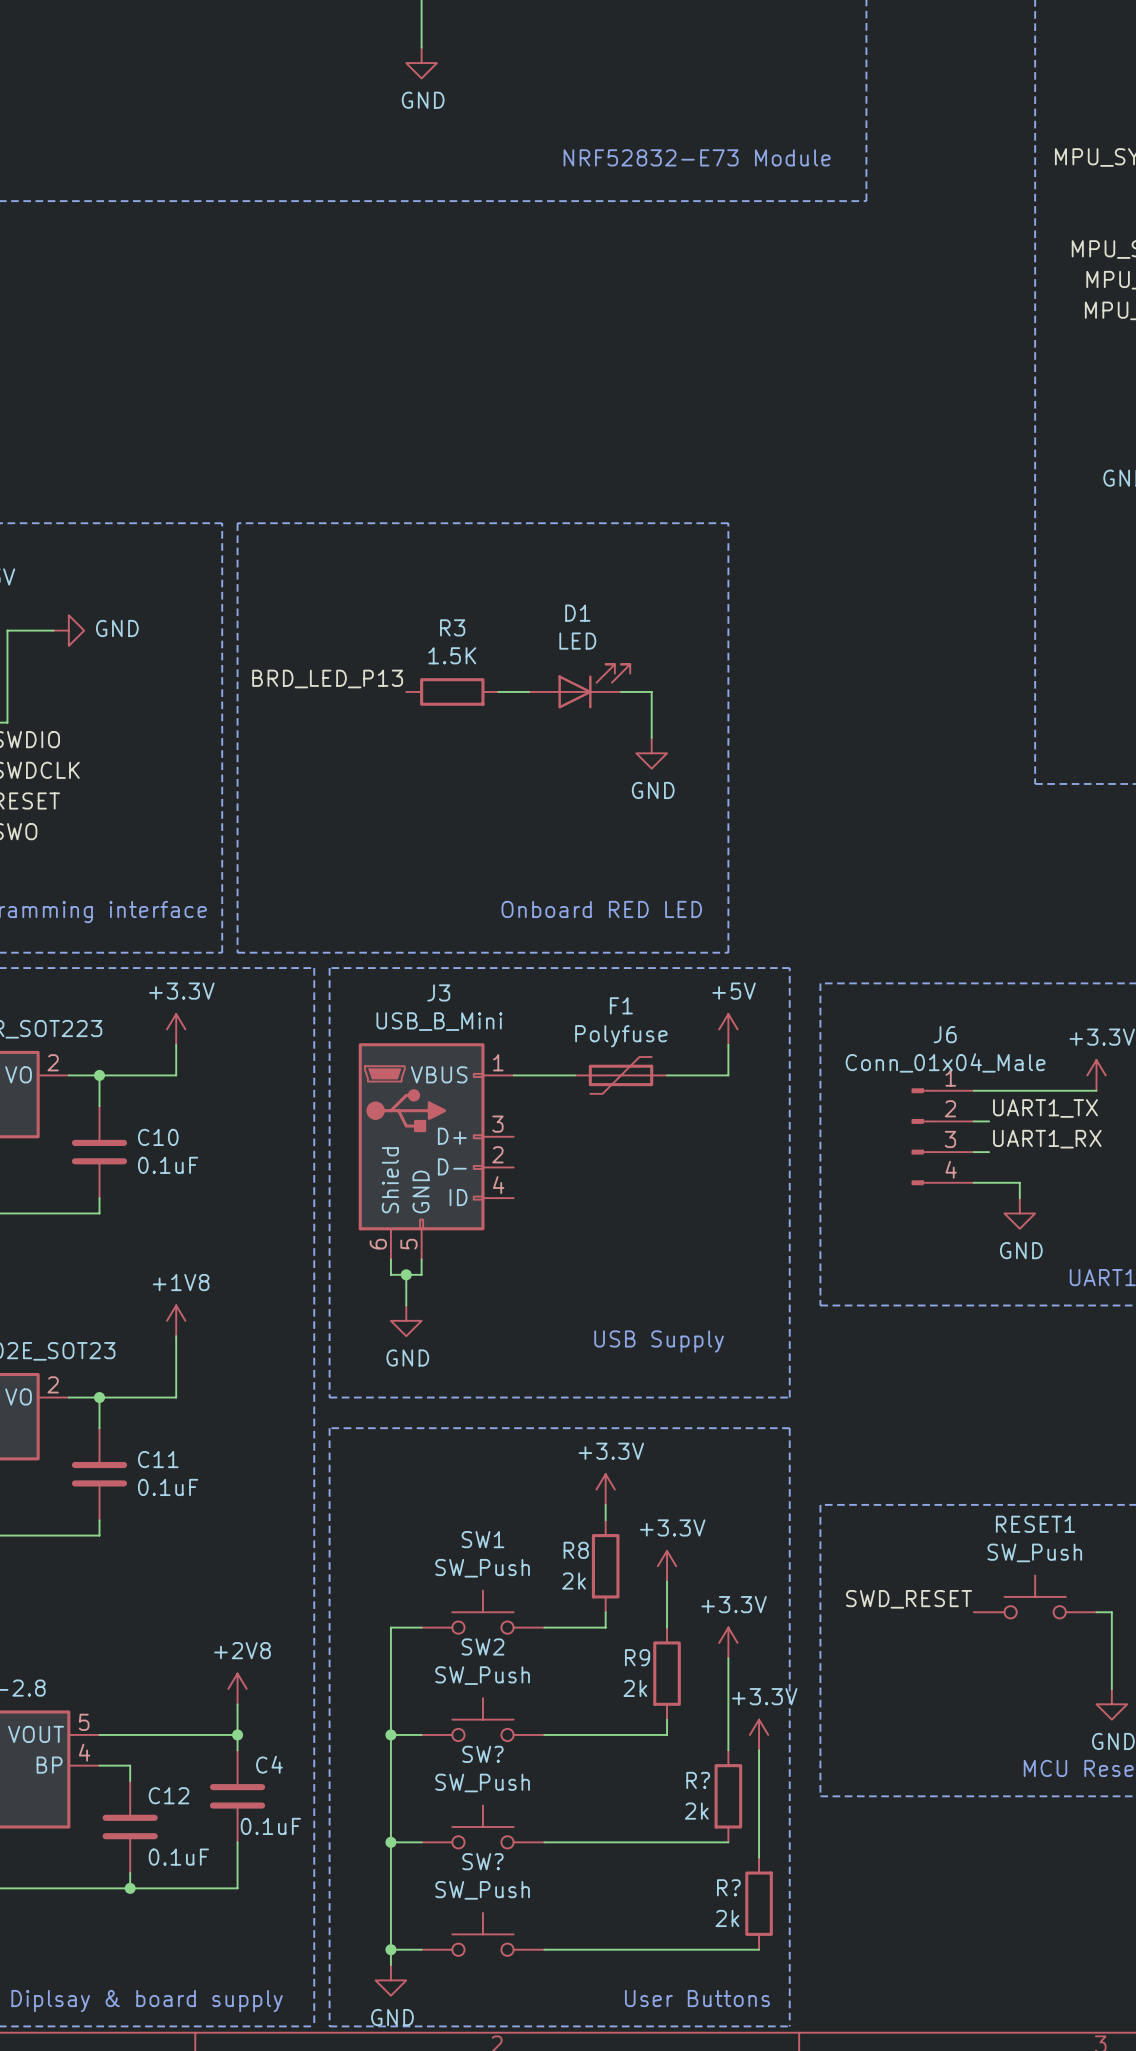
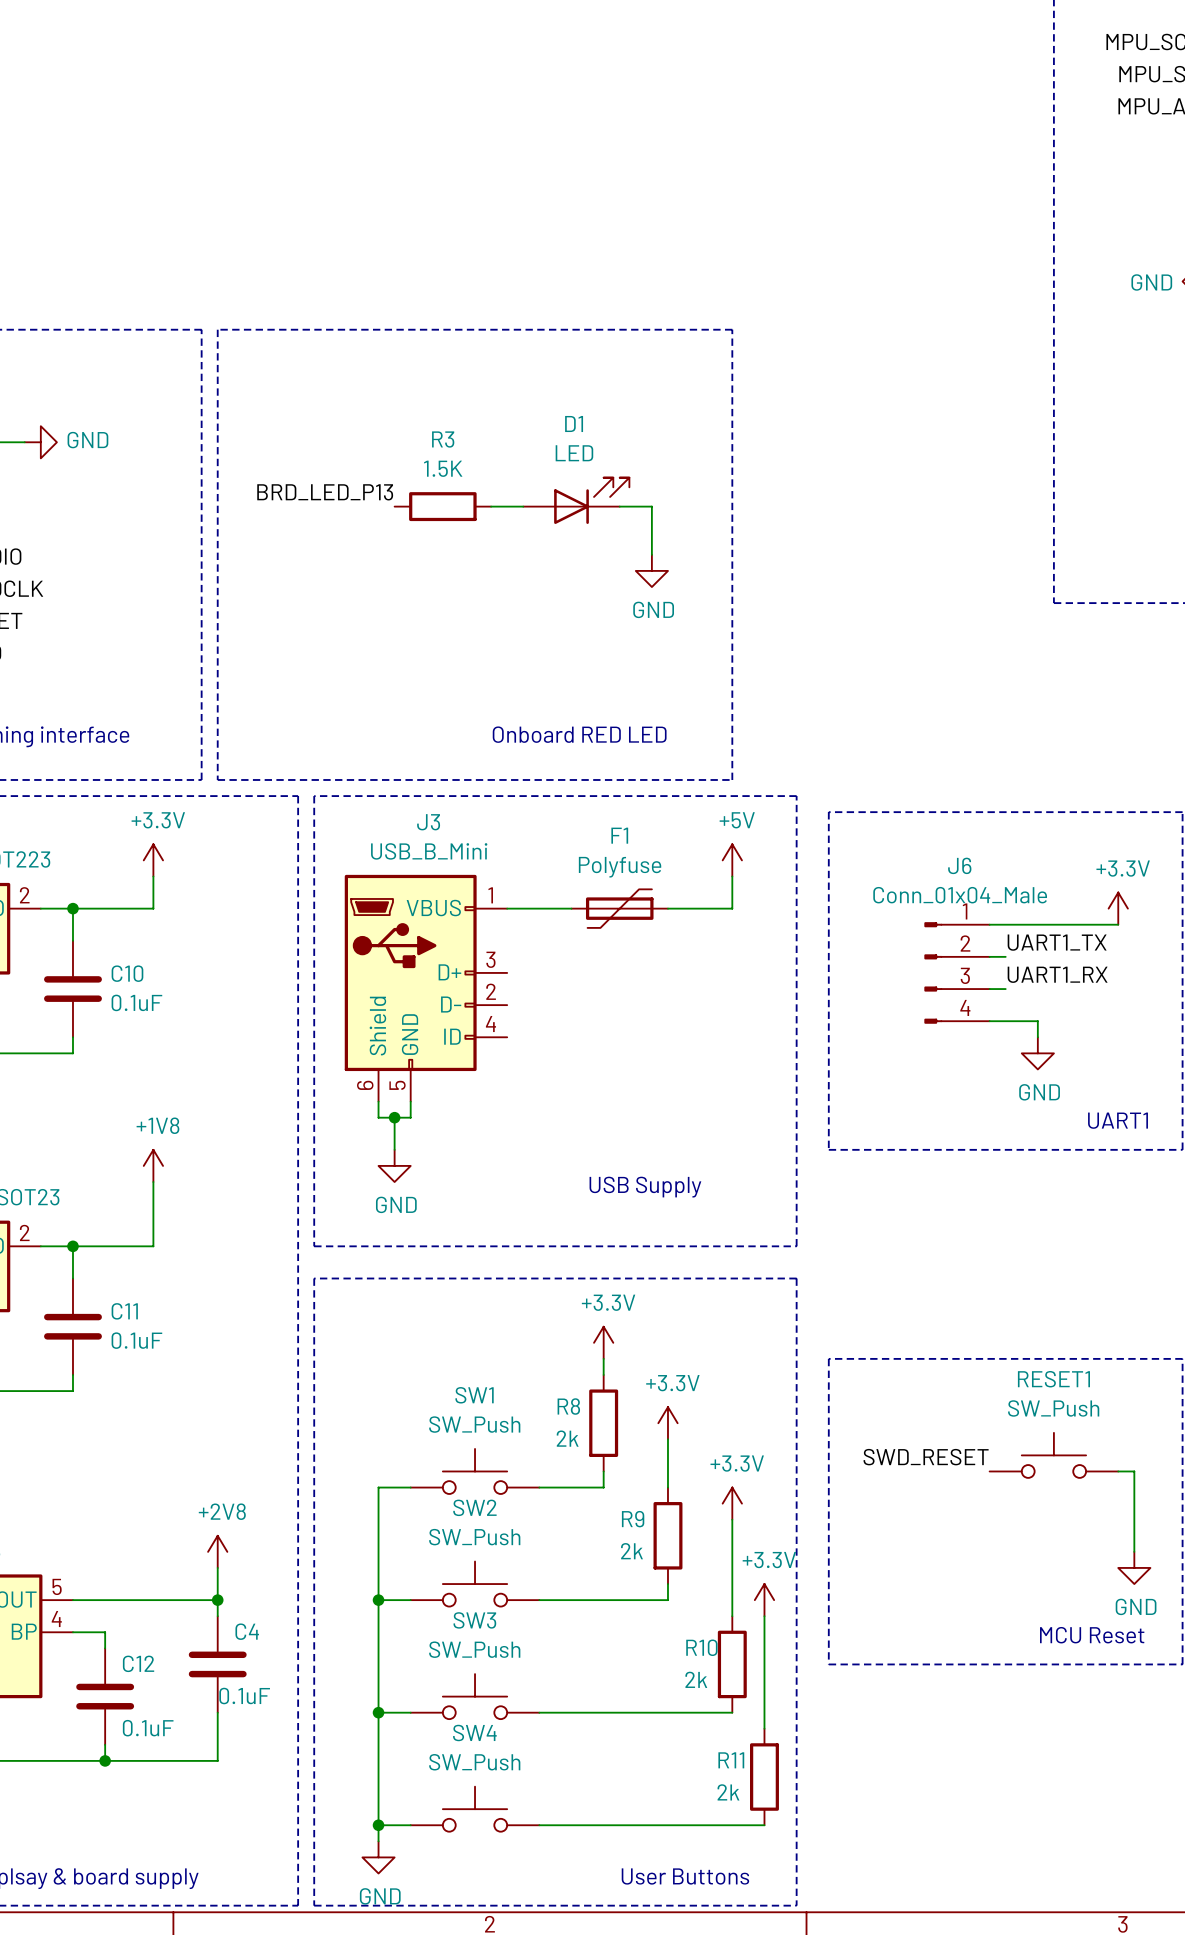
SW? name: SW? (482, 1754) -> SW3 (474, 1620)
R? name: R? (698, 1780) -> R10 (701, 1647)
SW? name: SW? (482, 1861) -> SW4 (474, 1732)
R? name: R? (728, 1887) -> R11 (731, 1760)

